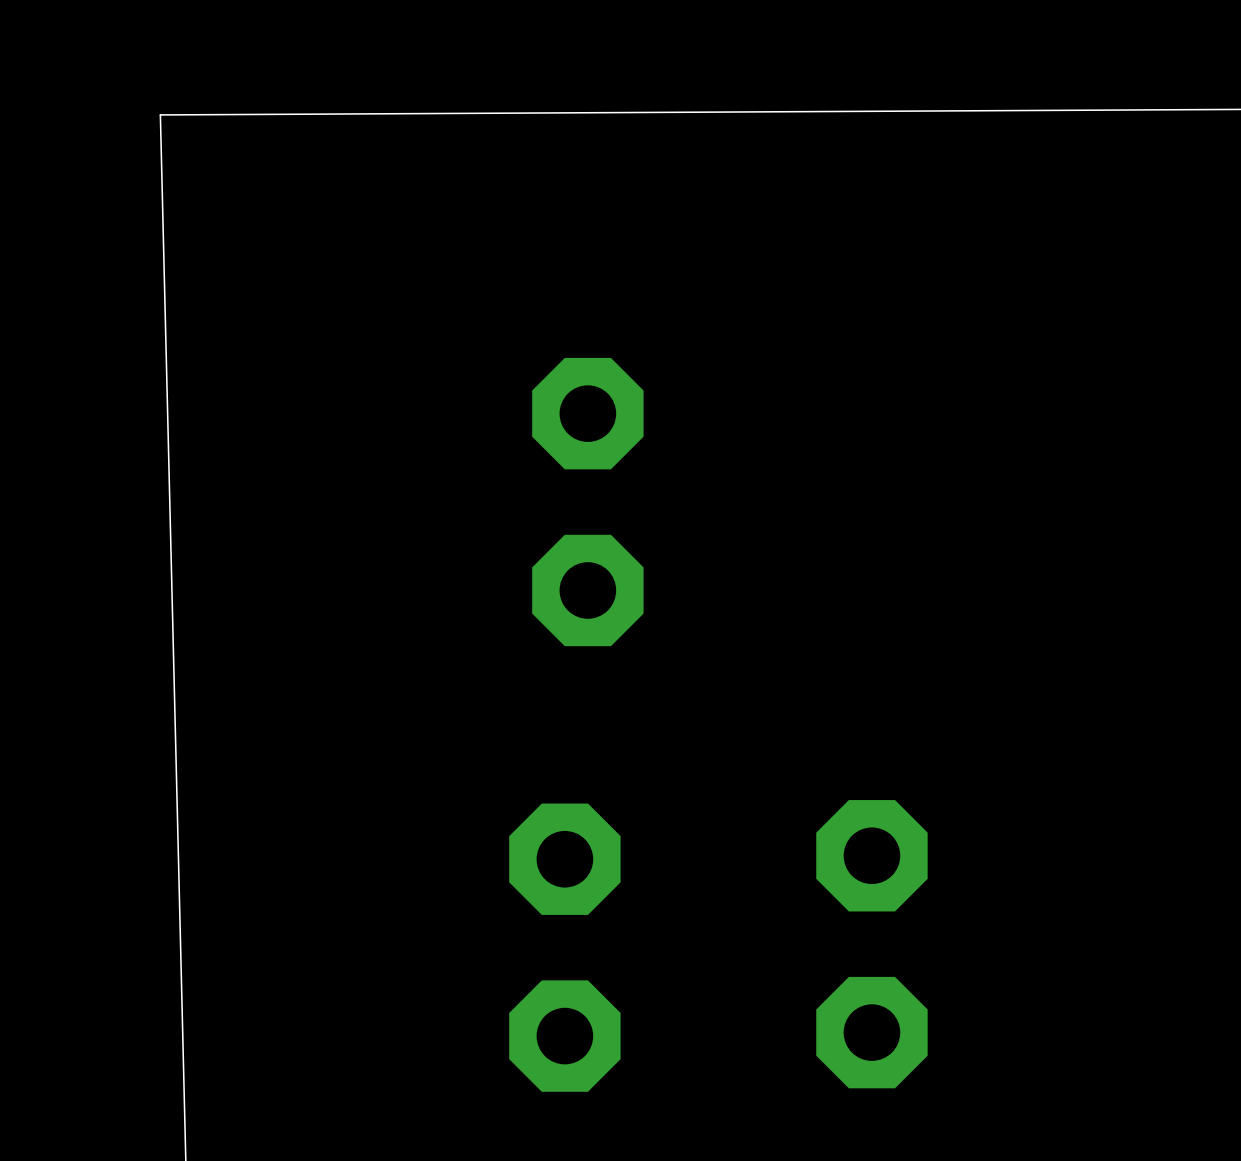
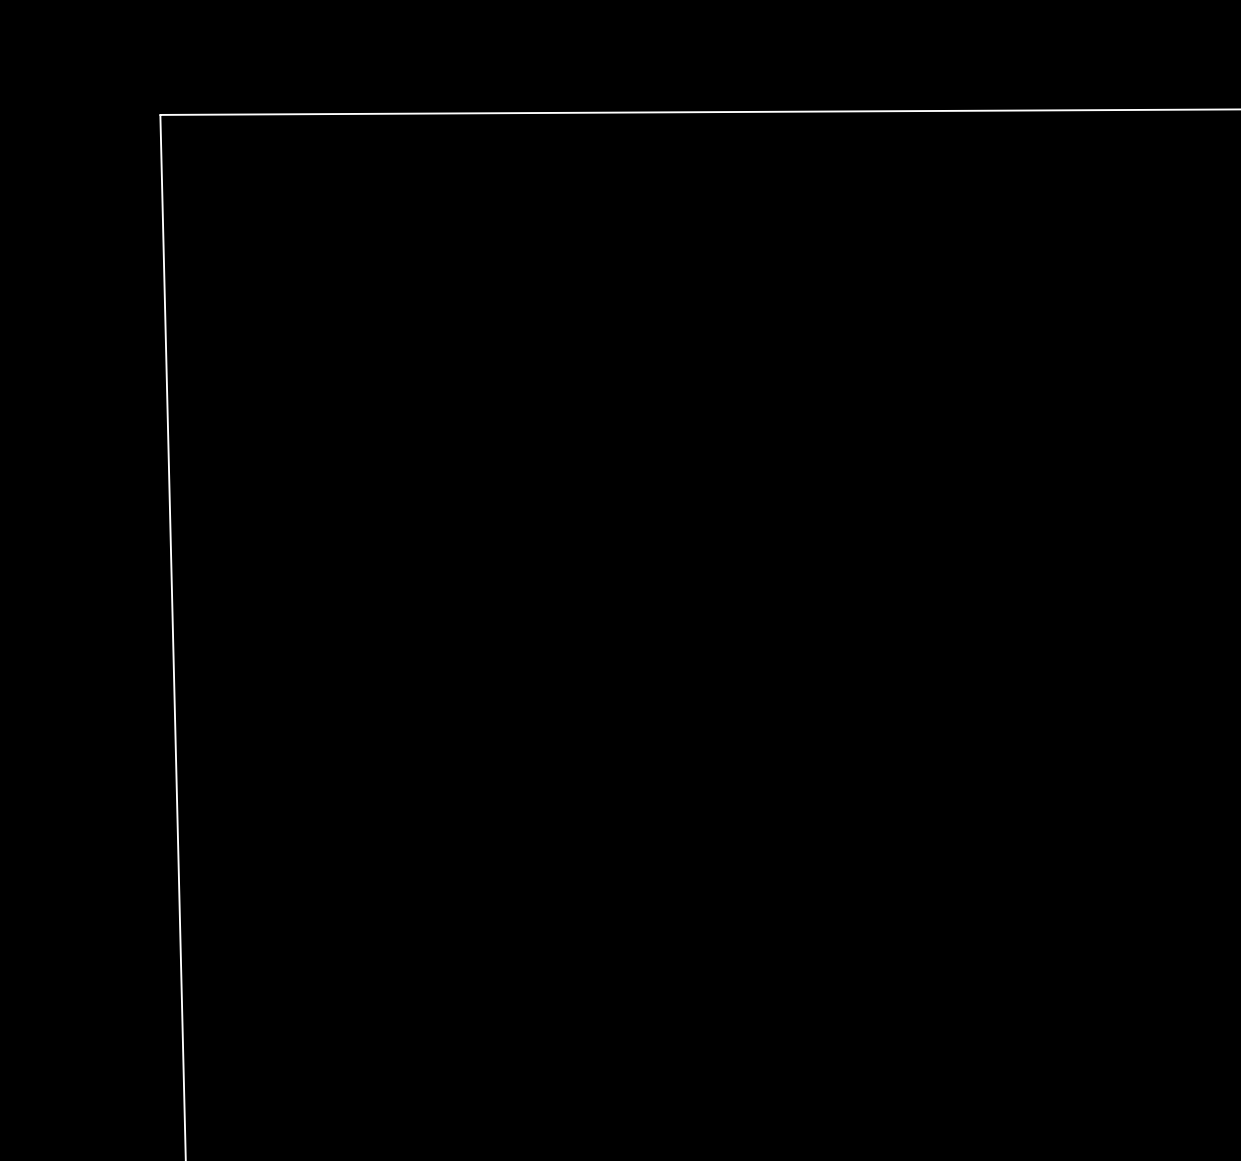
part: (587, 502) -> none
part: (871, 944) -> none
part: (564, 947) -> none

